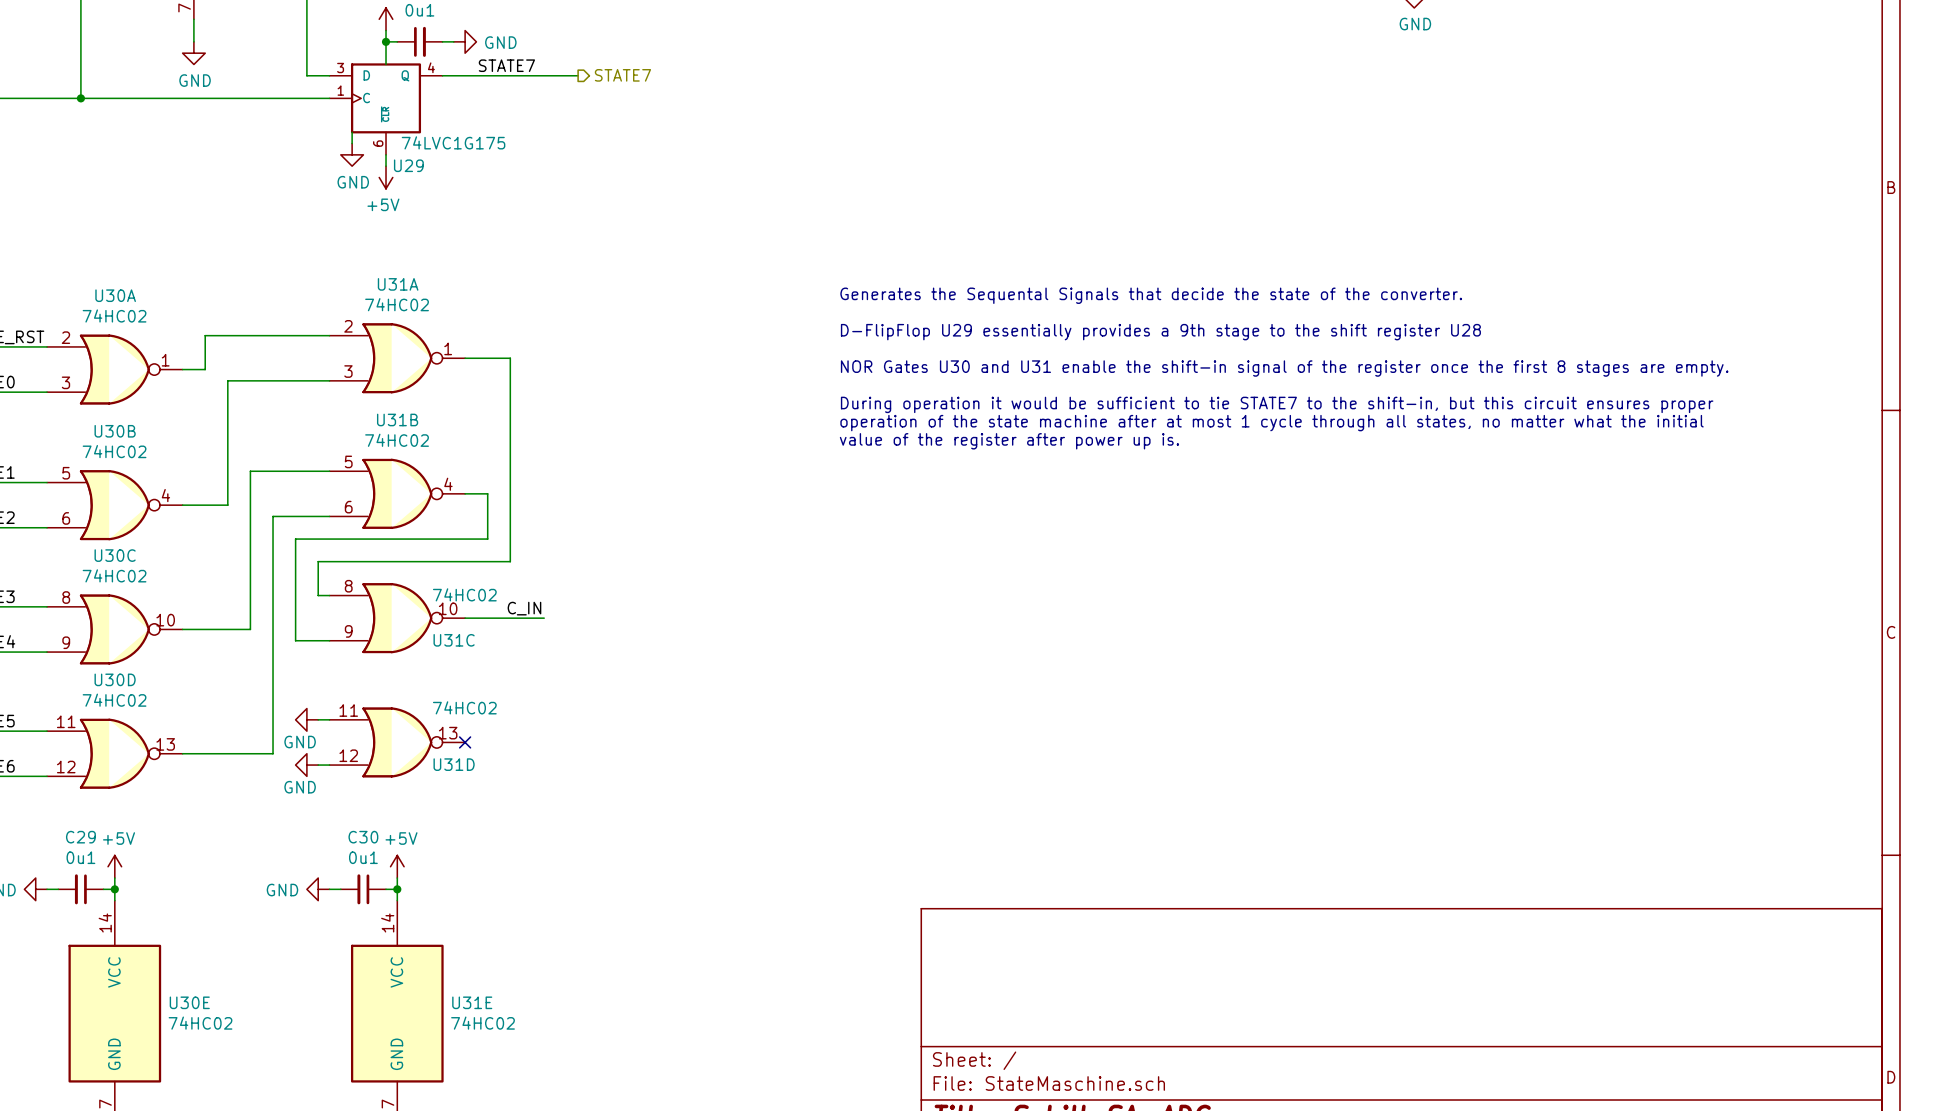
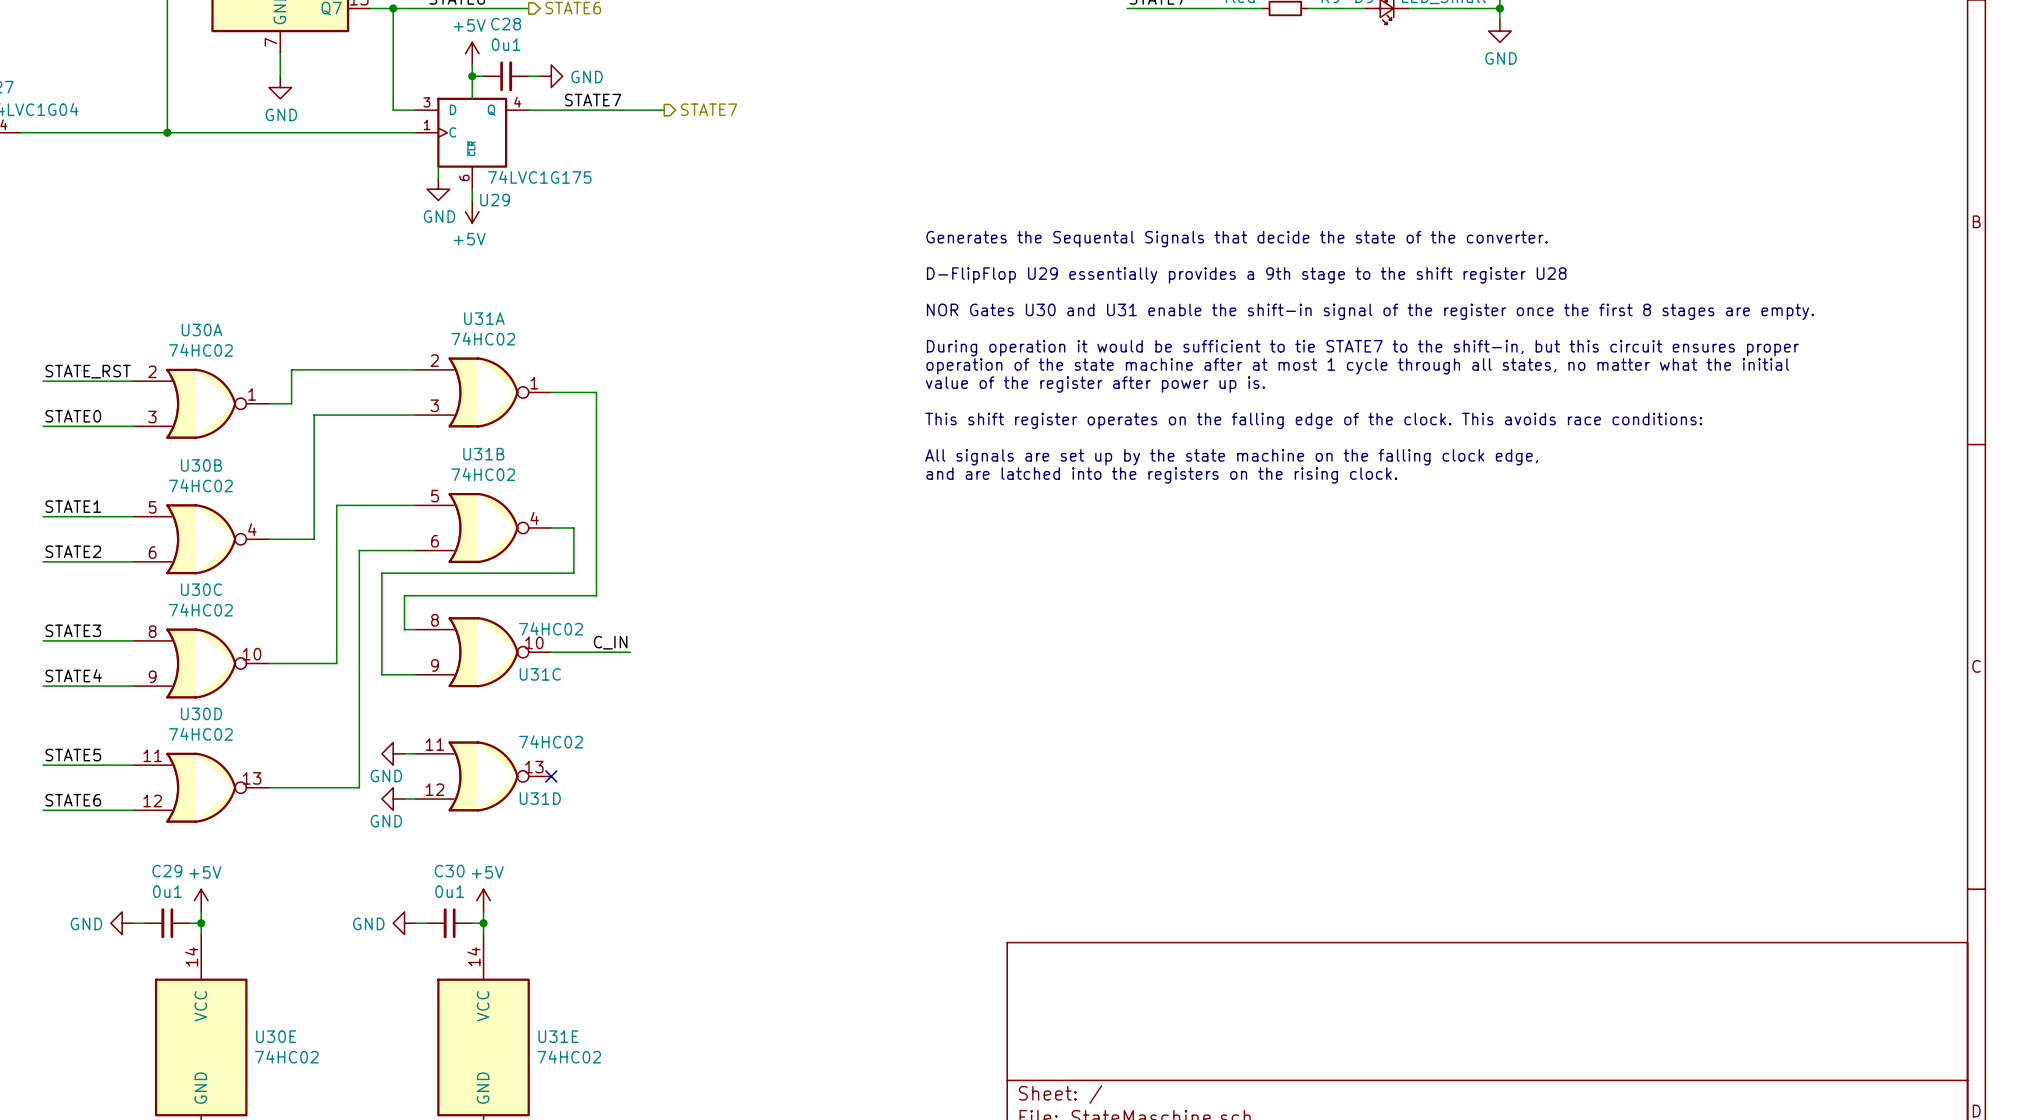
text: none -> D-FlipFlop U29 essentially provides a 9th stage to the shift register U28 (1246, 275)
text position: Generates the Sequental Signals that decide the state of the converter. (1151, 295) -> Generates the Sequental Signals that decide the state of the converter. (1237, 239)
text: D-FlipFlop U29 essentially provides a 9th stage to the shift register U28 (1160, 332) -> operation of the state machine after at most 1 cycle through all states, no matter what the initial (1357, 366)
text: none -> value of the register after power up is. (1095, 384)
text position: NOR Gates U30 and U31 enable the shift-in signal of the register once the first 8 stages are empty. (1284, 368) -> NOR Gates U30 and U31 enable the shift-in signal of the register once the first 8 stages are empty. (1370, 311)
text: none -> This shift register operates on the falling edge of the clock. This avoids race conditions: (1313, 420)
text position: During operation it would be sufficient to tie STATE7 to the shift-in, but this circuit ensures proper (1277, 404) -> During operation it would be sufficient to tie STATE7 to the shift-in, but this circuit ensures proper (1362, 348)
text: operation of the state machine after at most 1 cycle through all states, no matter what the initial (1272, 423) -> All signals are set up by the state machine on the falling clock edge, (1231, 457)
text: value of the register after power up is. (1009, 441) -> and are latched into the registers on the rising clock. (1161, 475)

